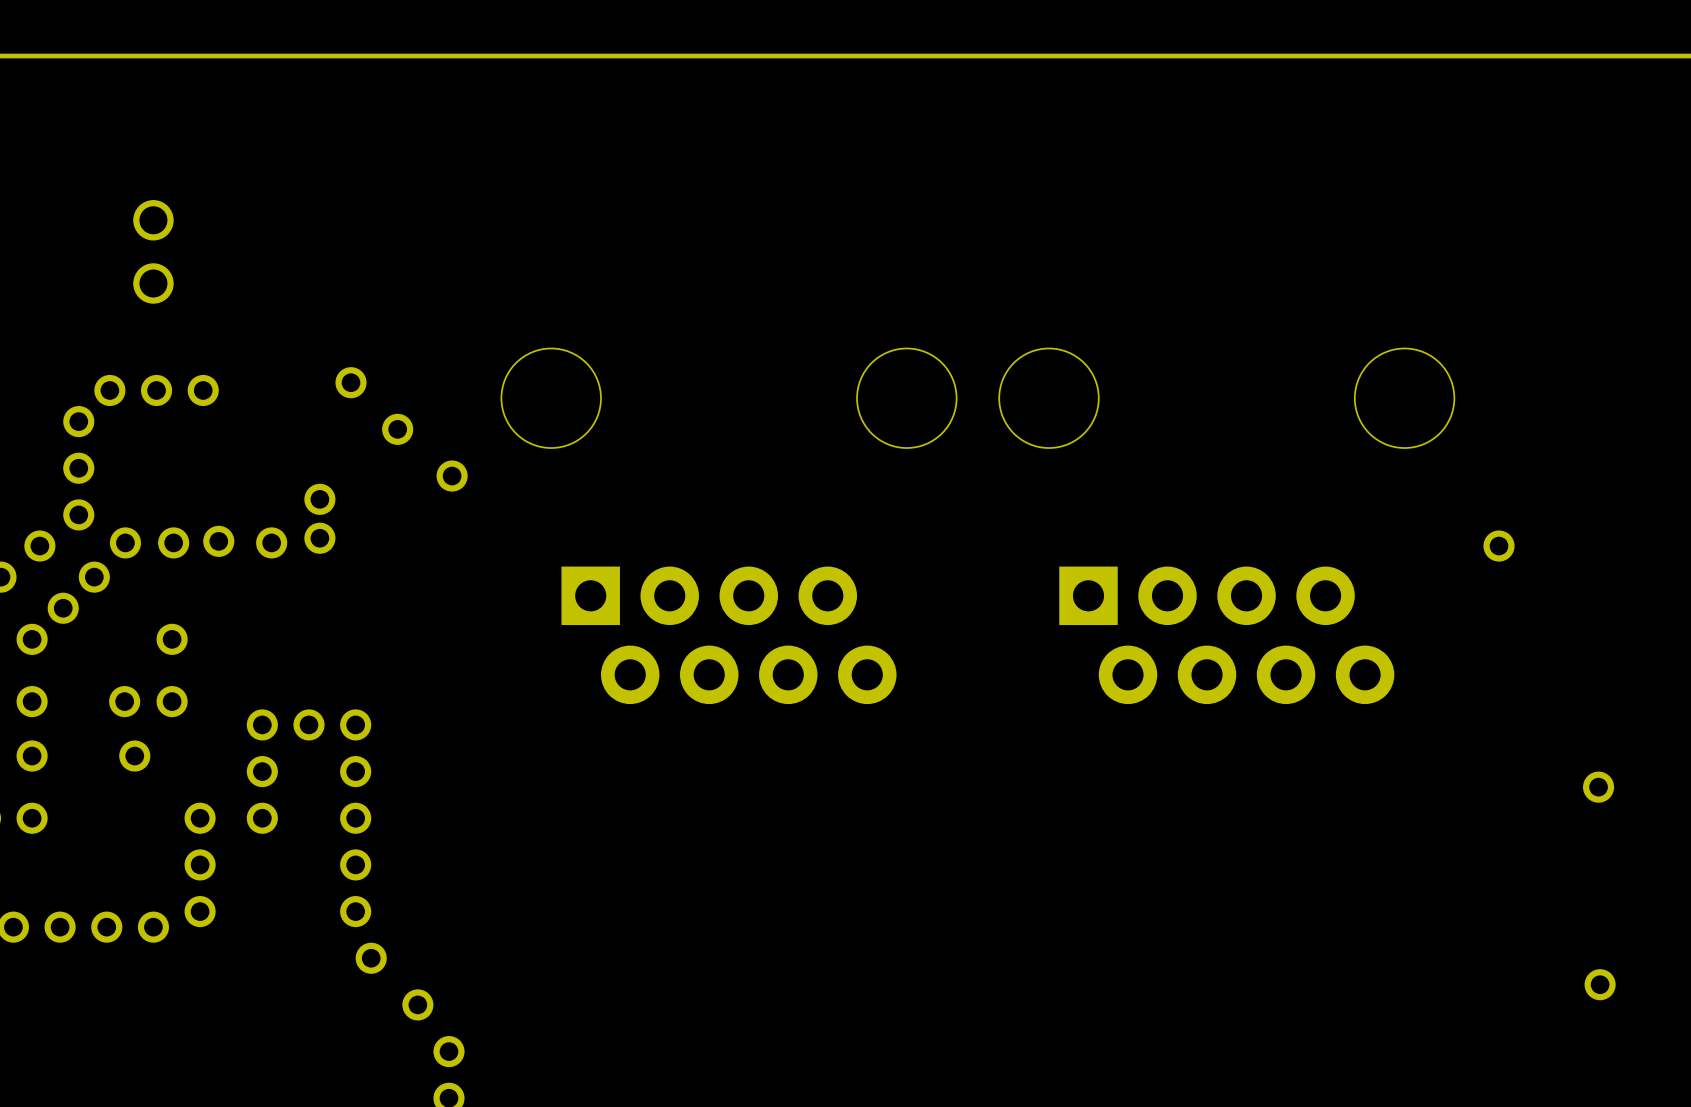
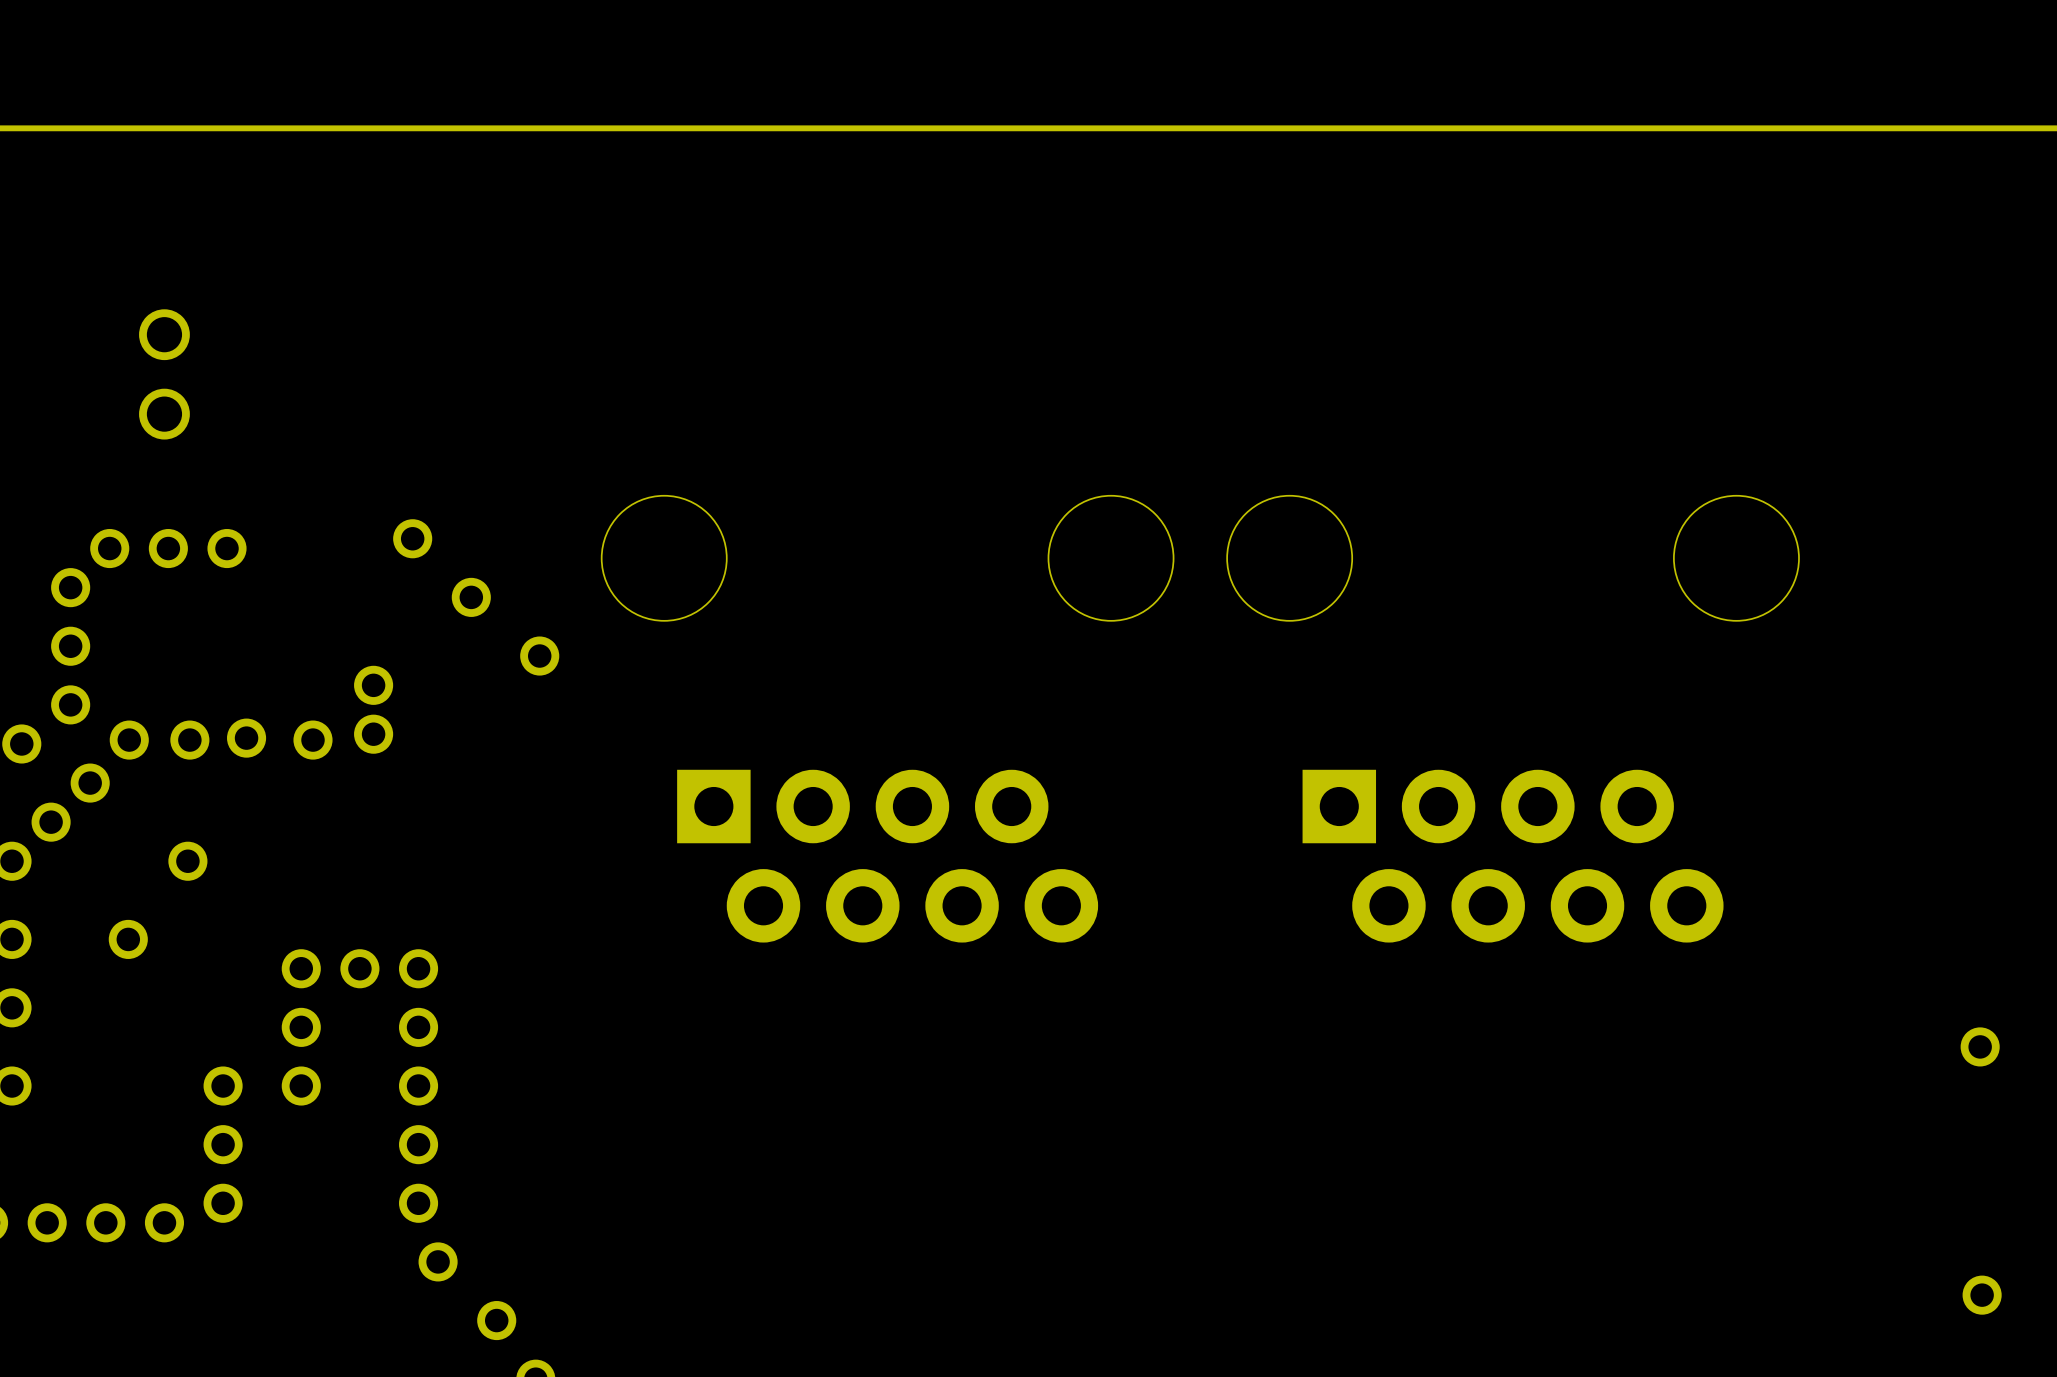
part: (1499, 546) -> none
part: (172, 701) -> none
part: (134, 756) -> none

